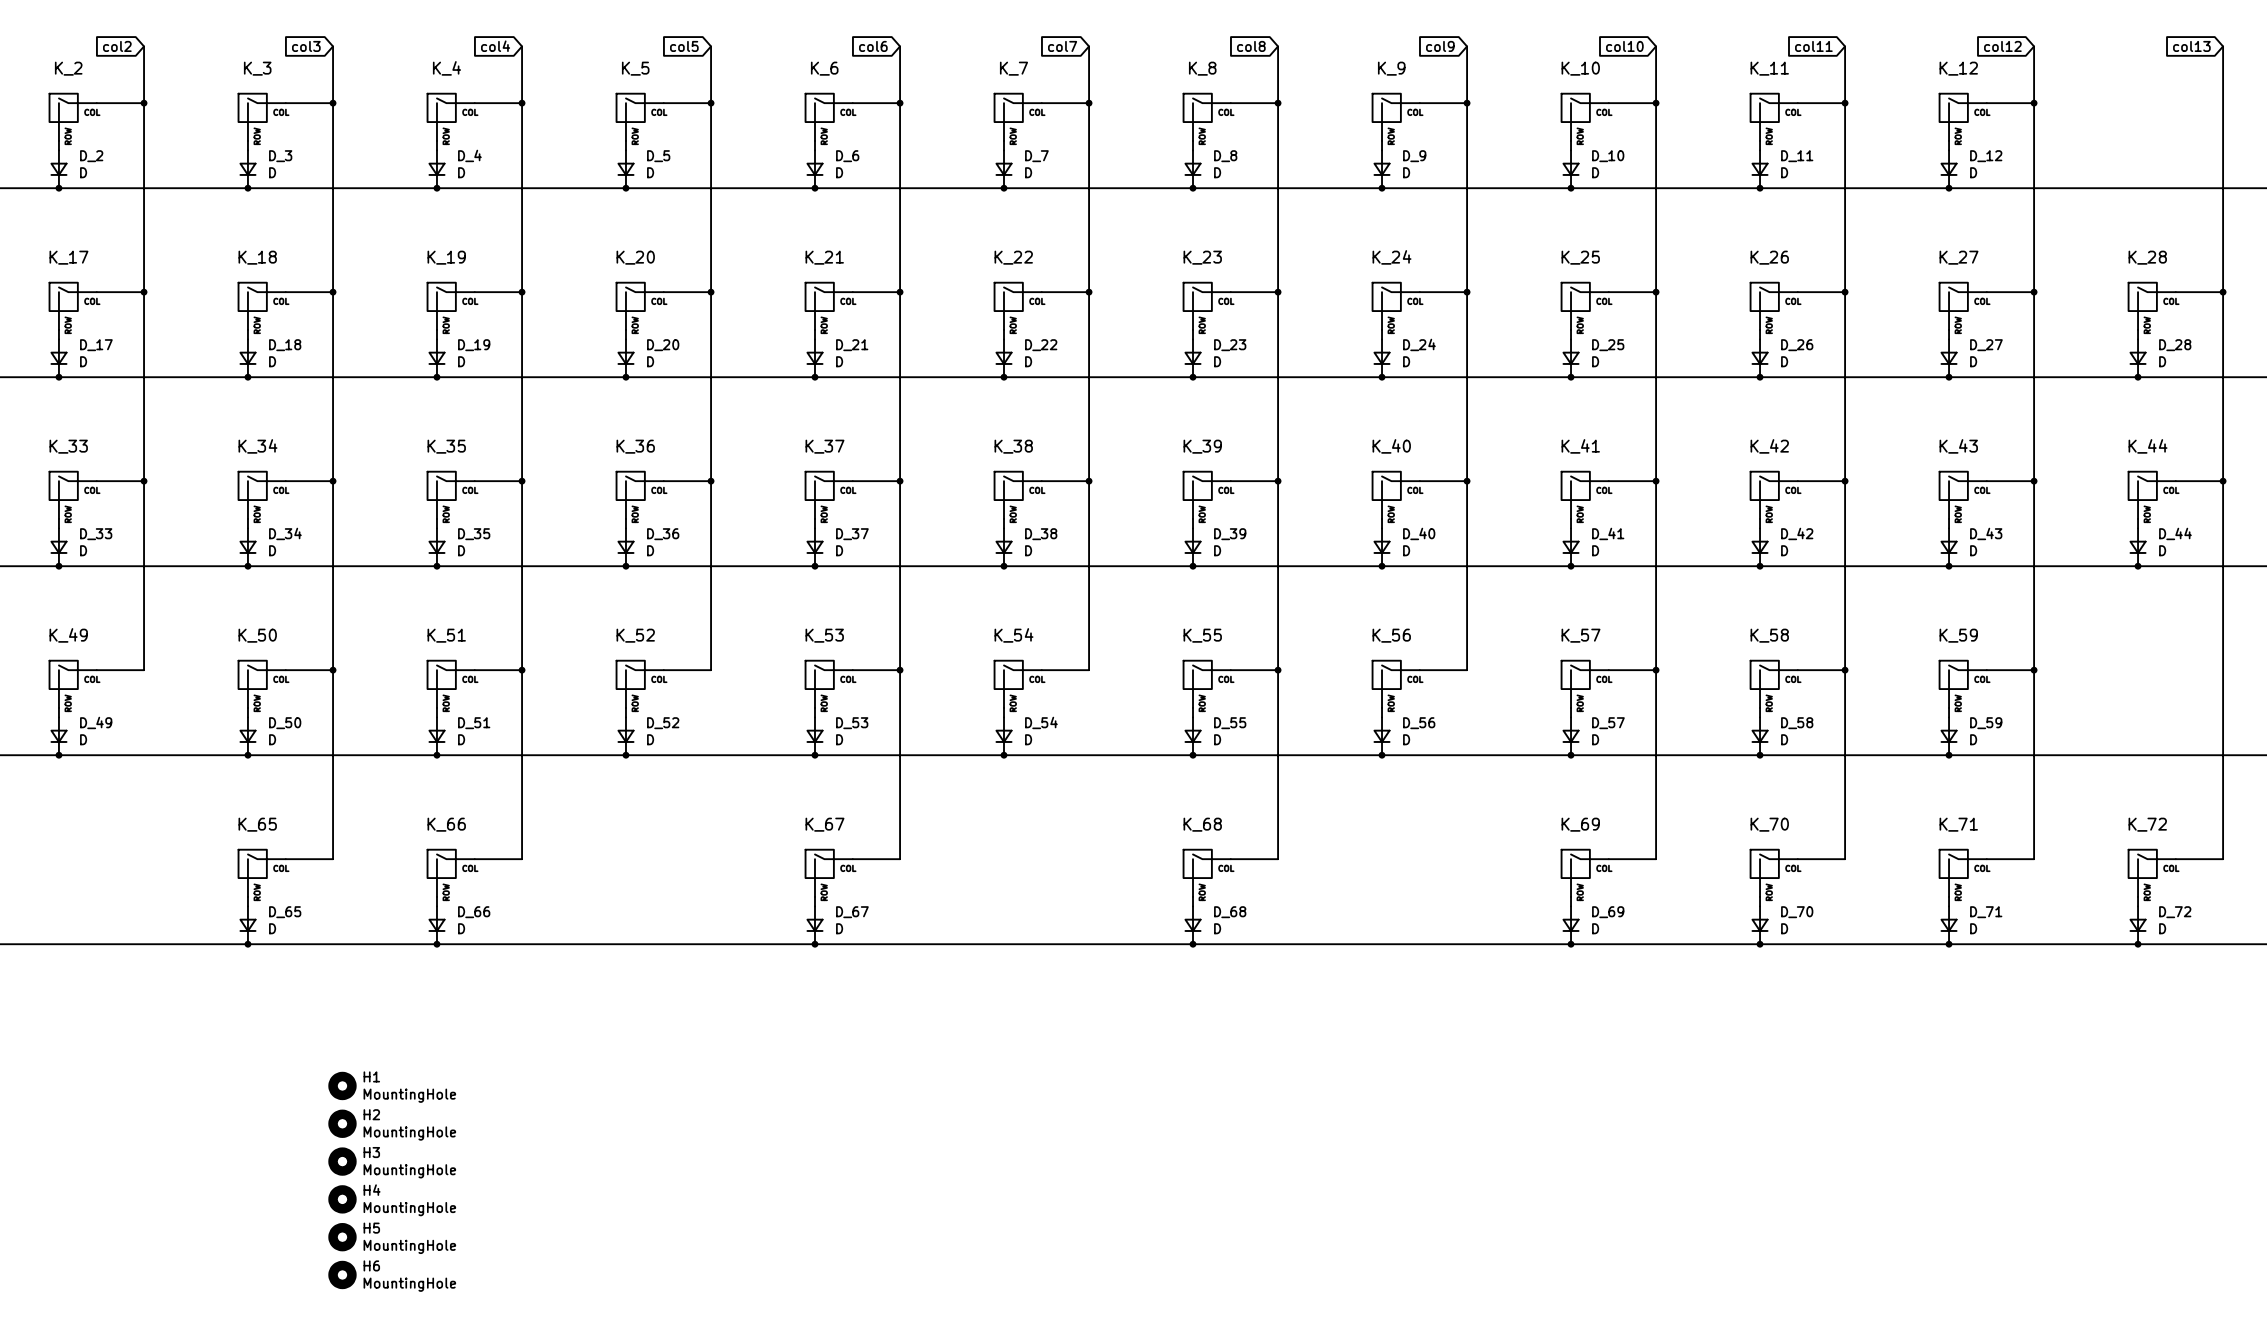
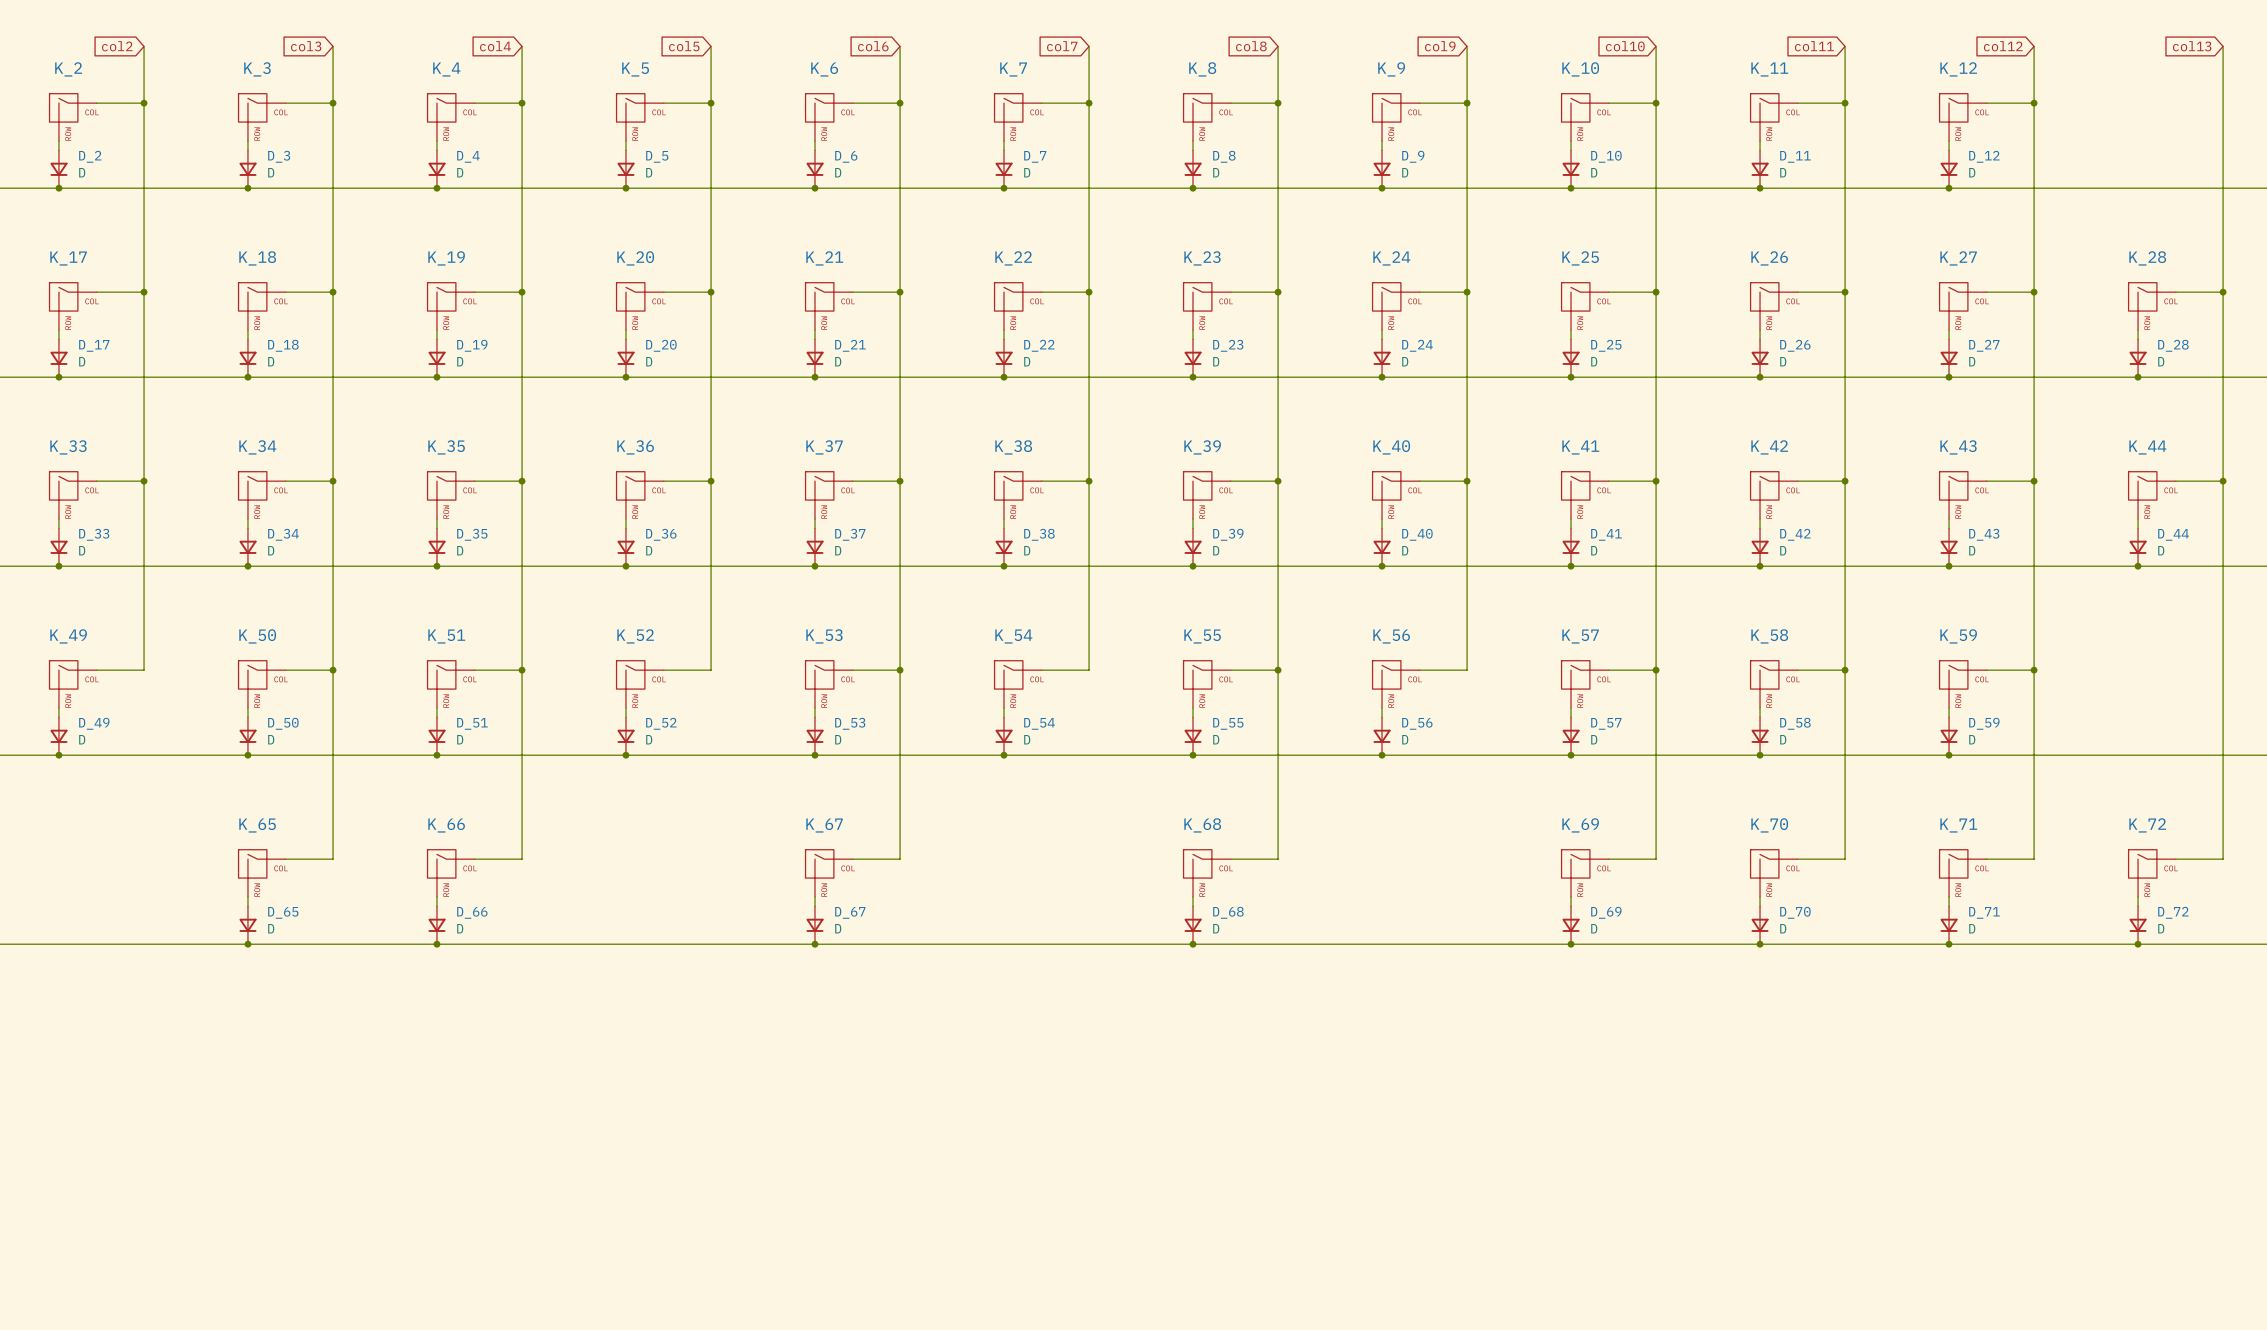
H1: MountingHole (342, 1085) -> none
H2: MountingHole (342, 1123) -> none
H3: MountingHole (342, 1161) -> none
H4: MountingHole (342, 1199) -> none
H5: MountingHole (342, 1237) -> none
H6: MountingHole (342, 1274) -> none

